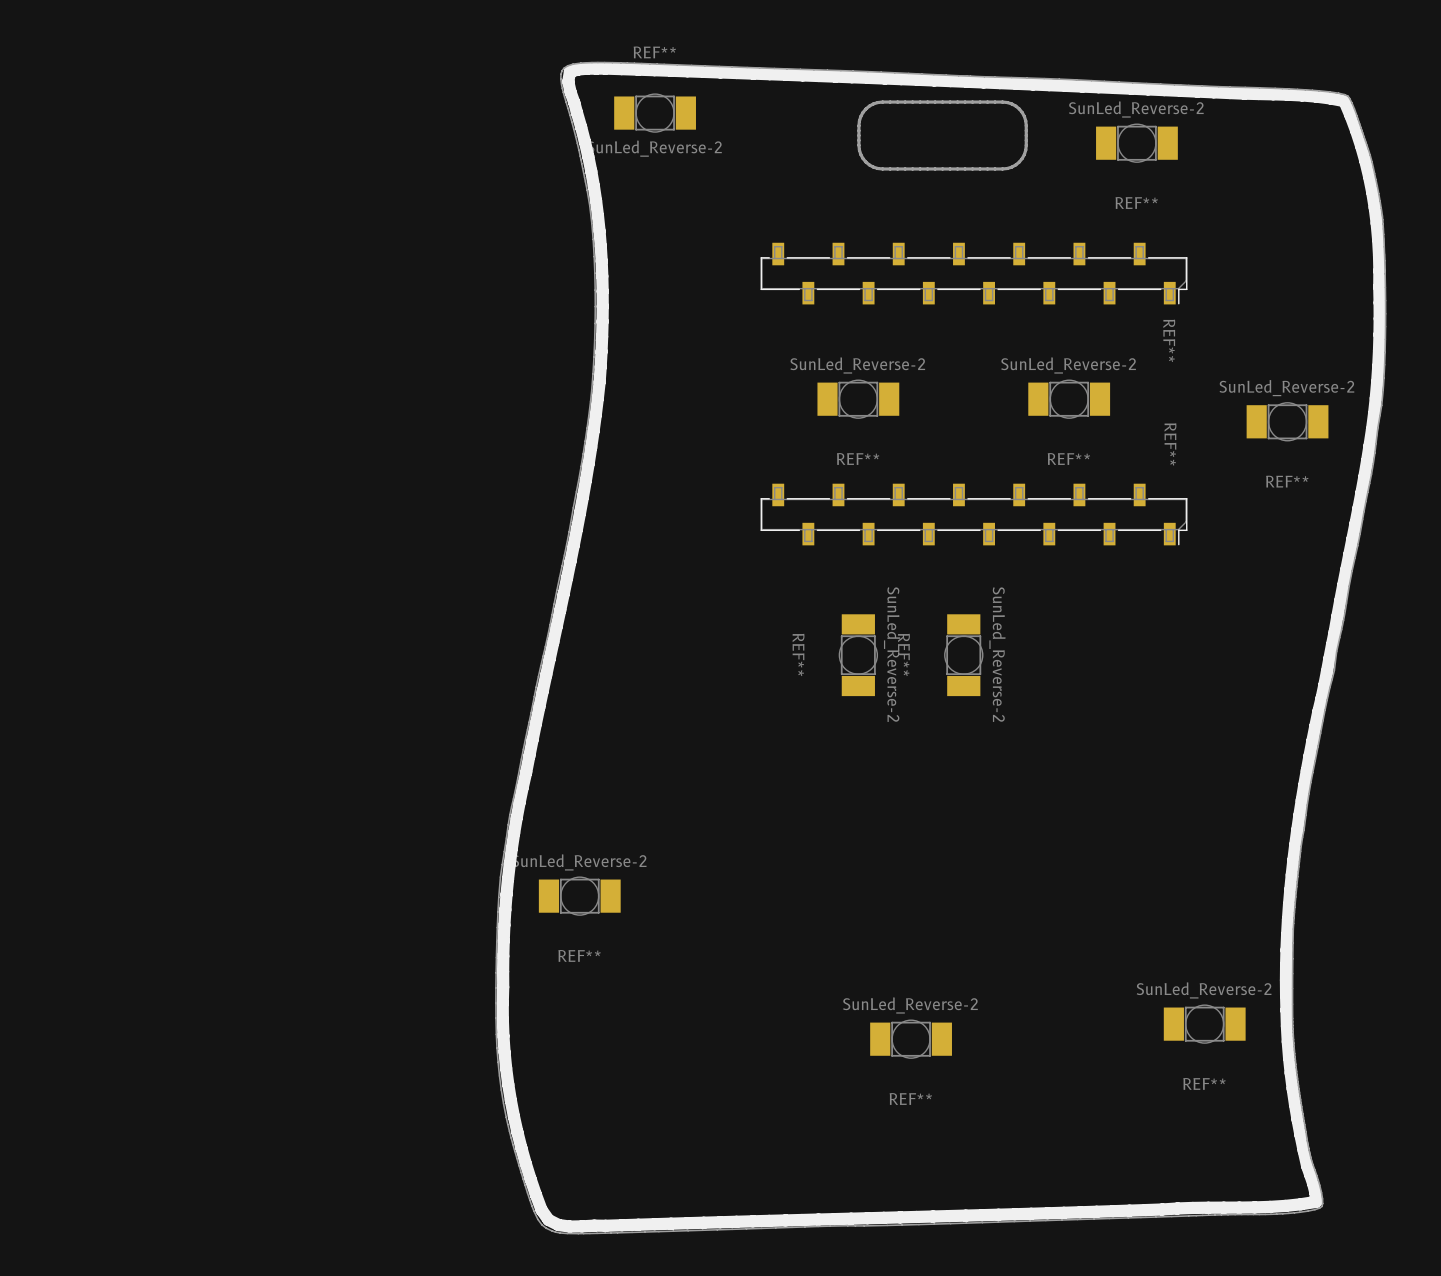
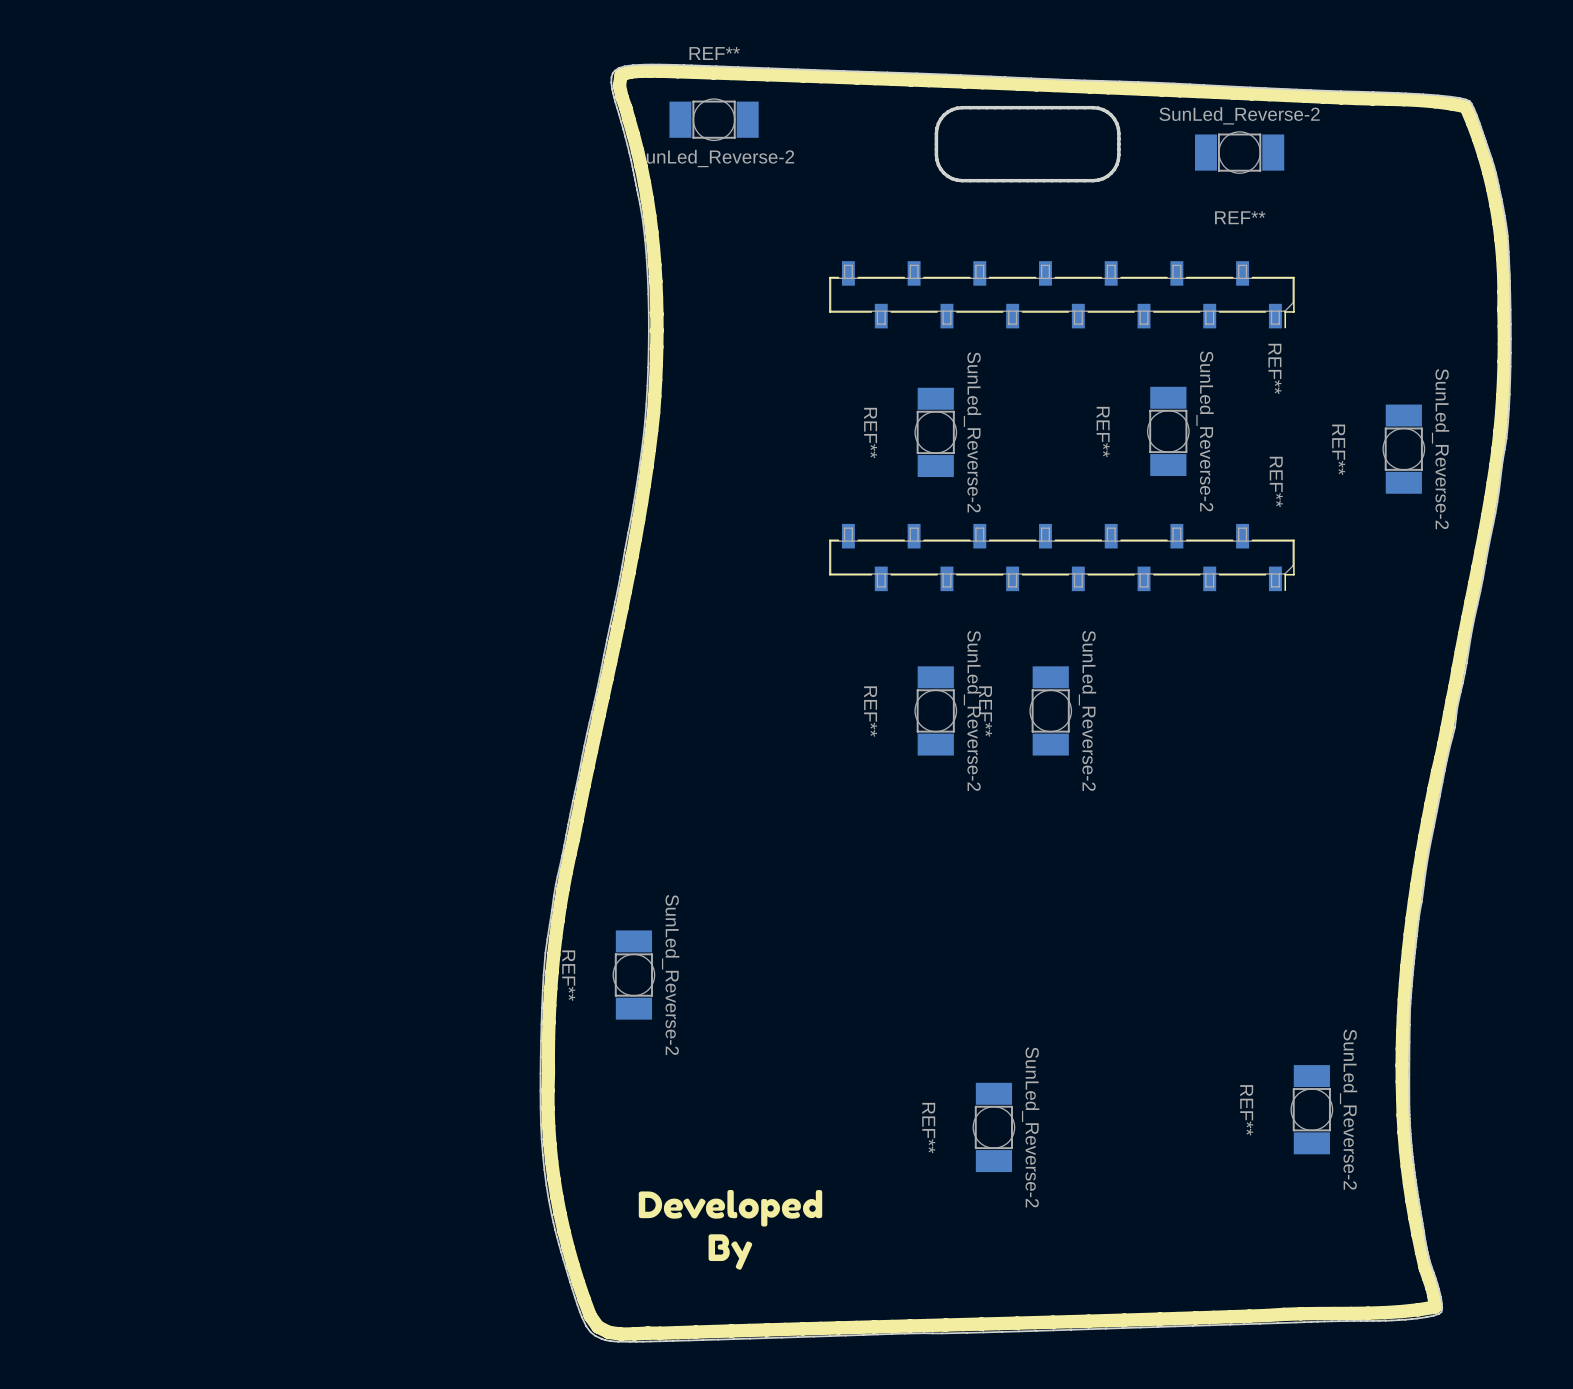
REF** rotation: 0° (858, 399) -> 90° clockwise (935, 432)
REF** rotation: 0° (1069, 399) -> 90° clockwise (1168, 431)
REF** rotation: 0° (1287, 421) -> 90° clockwise (1403, 449)
REF** rotation: 0° (579, 896) -> 90° clockwise (633, 975)
REF** rotation: 0° (1204, 1024) -> 90° clockwise (1311, 1109)
REF** rotation: 0° (911, 1039) -> 90° clockwise (993, 1127)
drawing: none -> [638, 1189, 823, 1270]

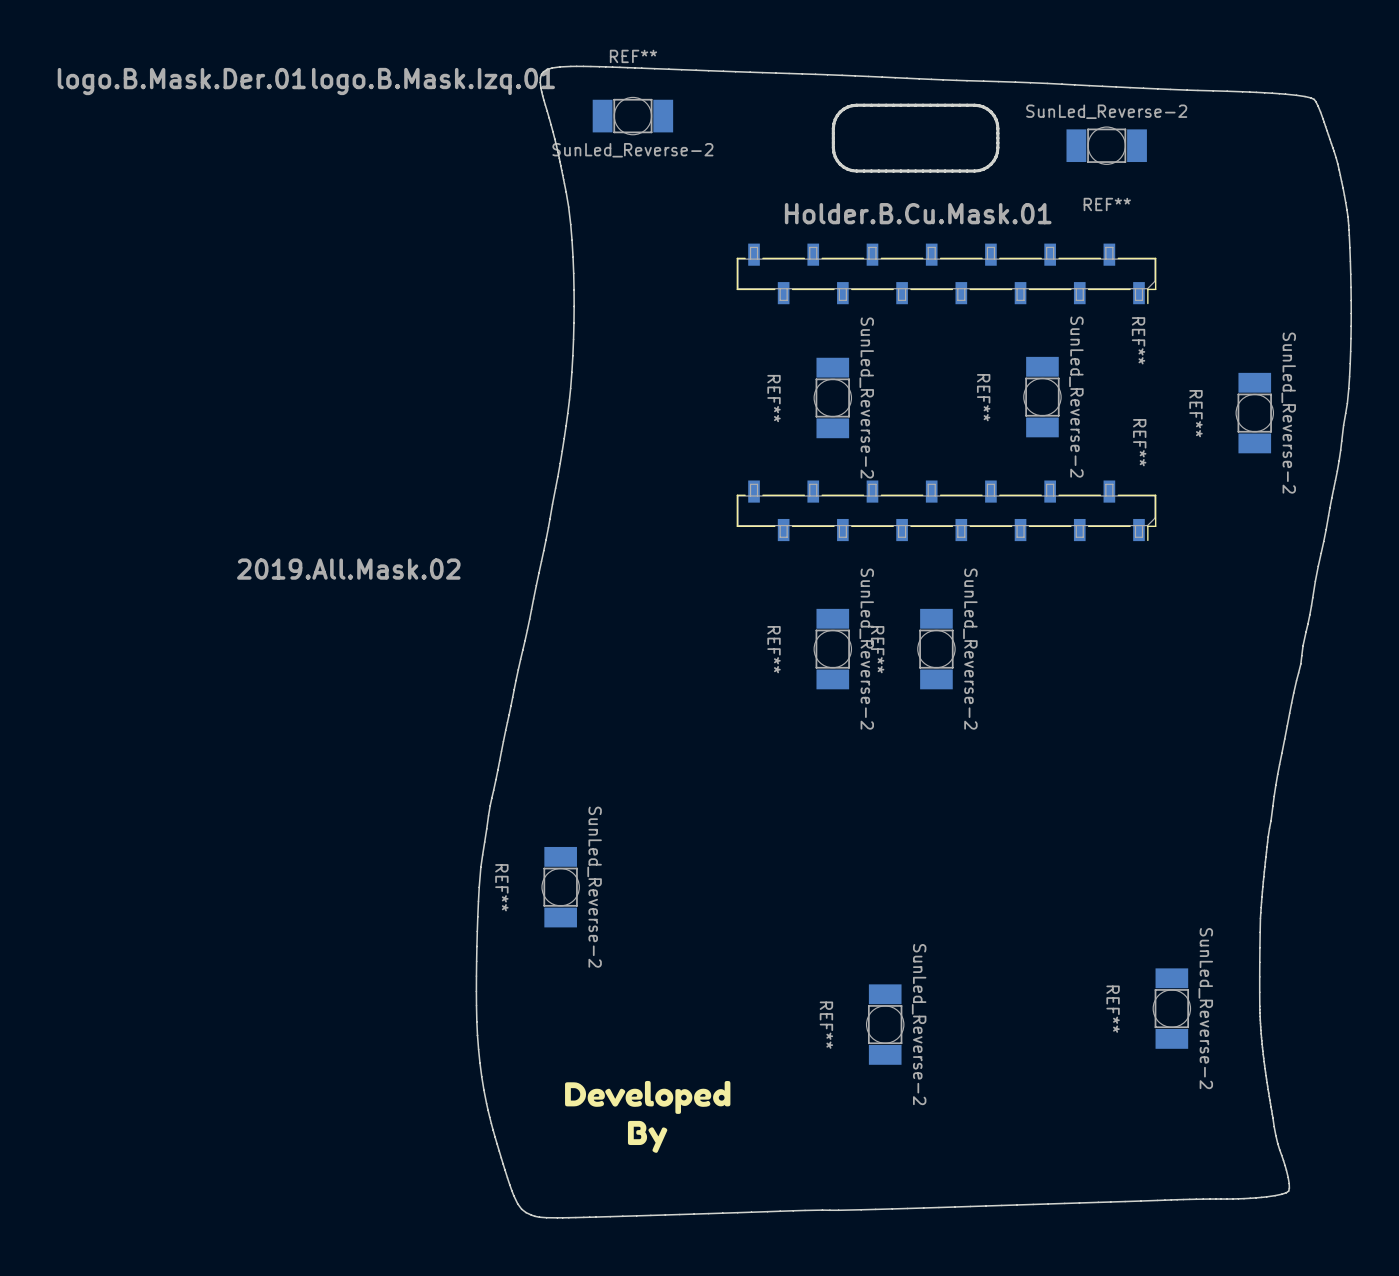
drawing: [541, 64, 1512, 1341] -> none
logo.B.Mask.Der.01: none -> (181, 81)
logo.B.Mask.Izq.01: none -> (433, 81)
Holder.B.Cu.Mask.01: none -> (918, 213)
2019.All.Mask.02: none -> (348, 569)

